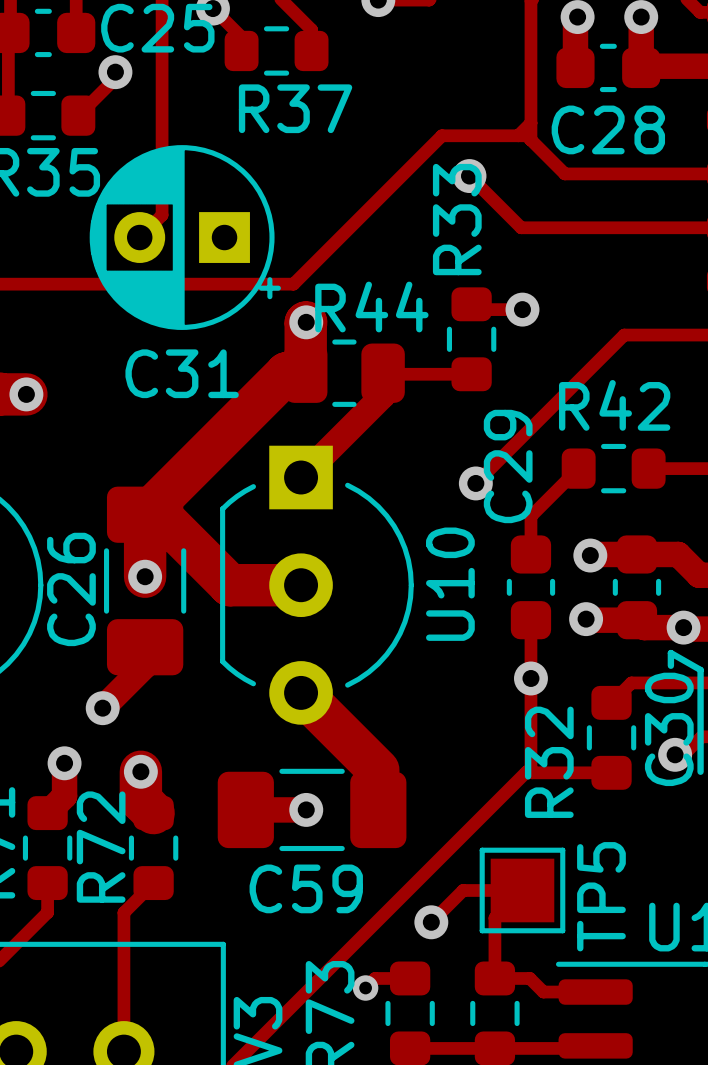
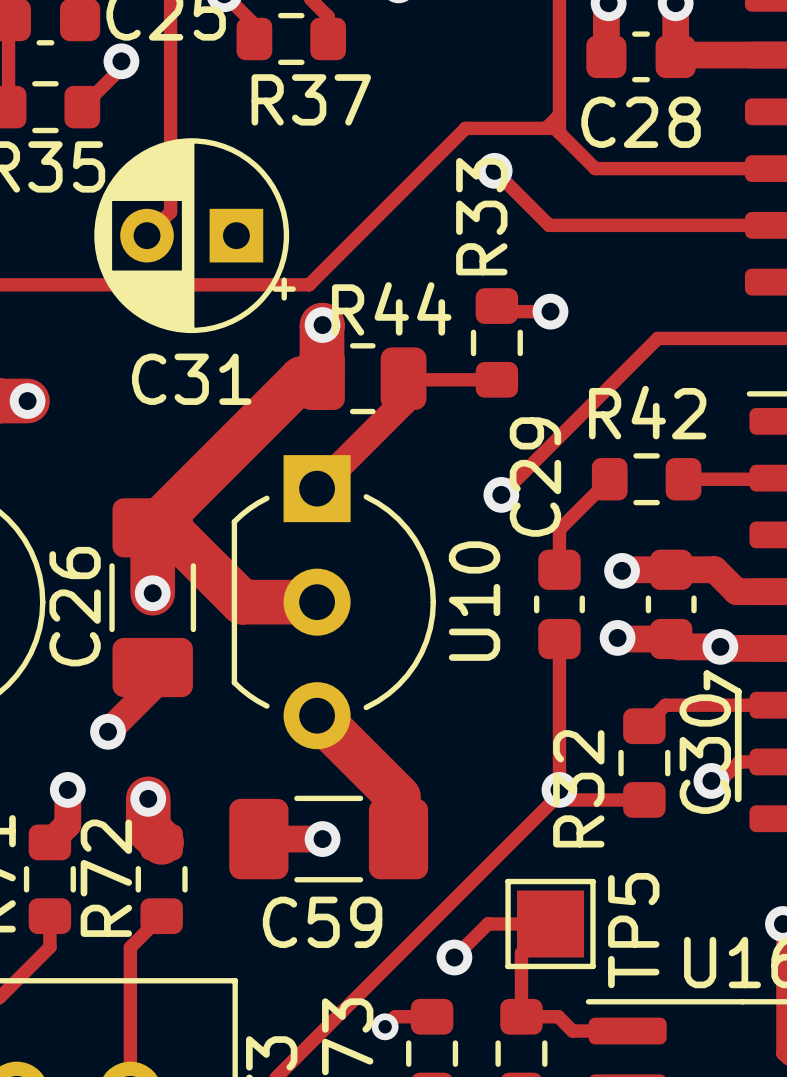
via position: (530, 678) -> (559, 789)

